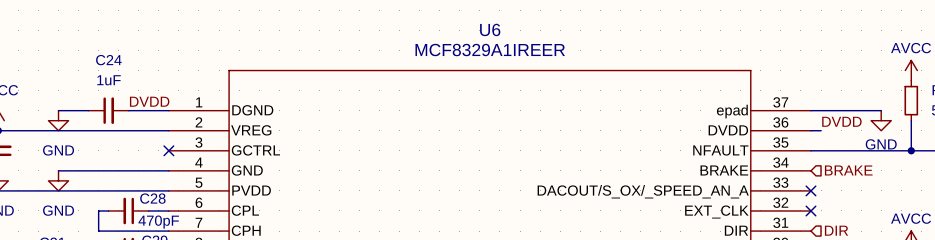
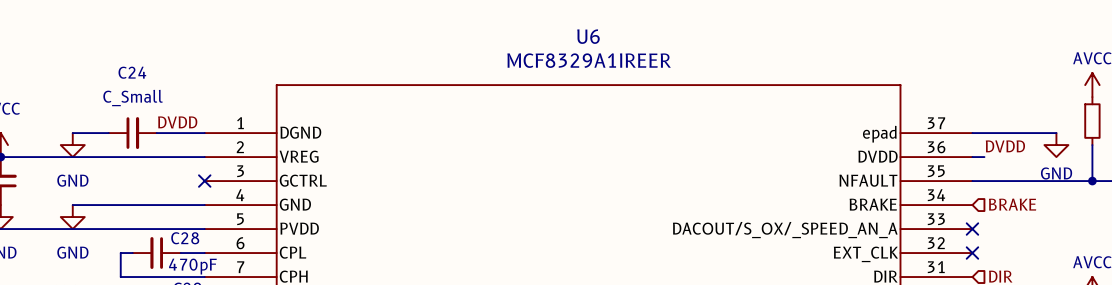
C24 value: 1uF (108, 80) -> C_Small (133, 98)

